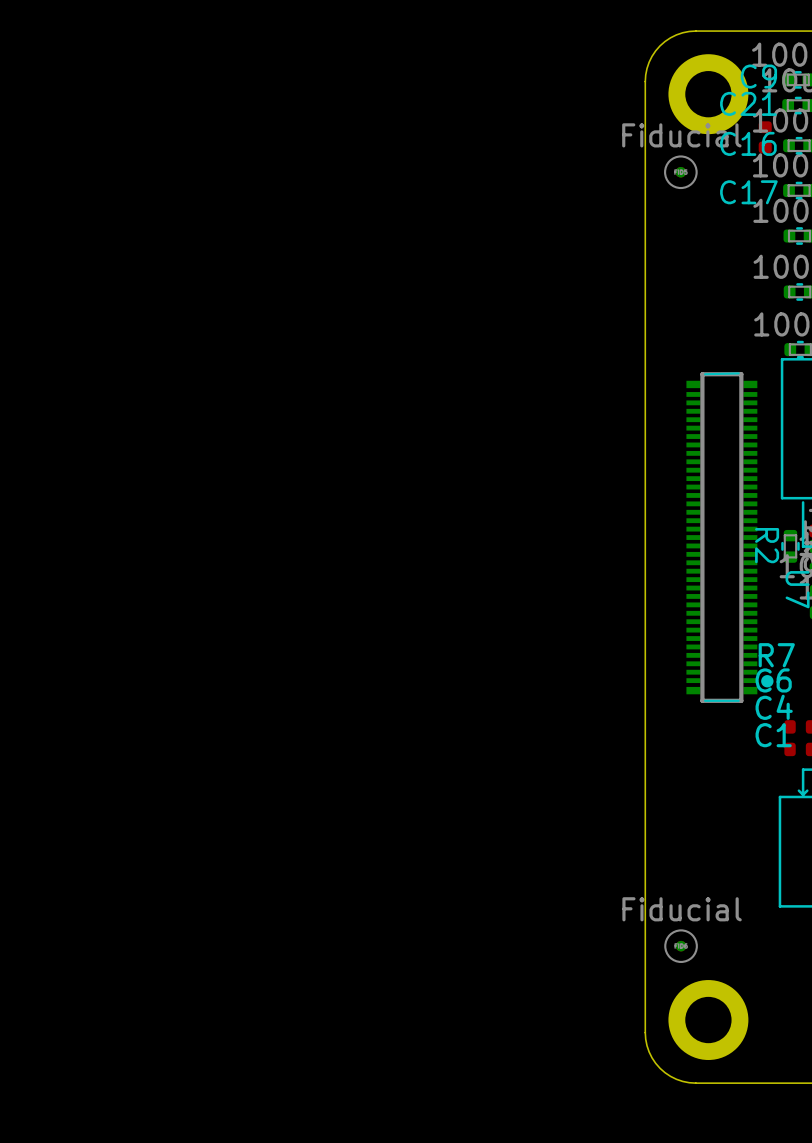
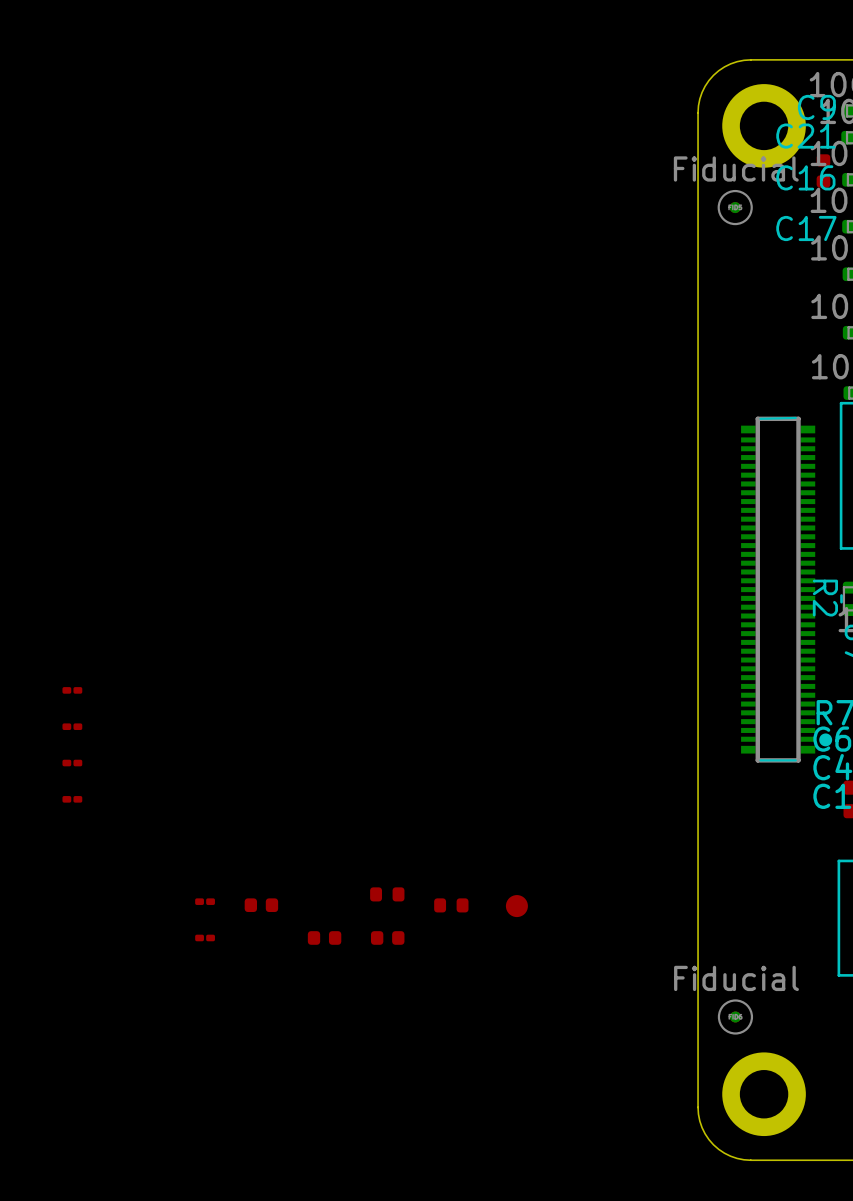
part: none -> (72, 690)
part: none -> (72, 726)
part: none -> (72, 763)
part: none -> (72, 799)
part: none -> (387, 894)
part: none -> (205, 901)
part: none -> (261, 905)
part: none -> (451, 905)
part: none -> (516, 906)
part: none -> (205, 937)
part: none -> (324, 937)
part: none -> (387, 937)

